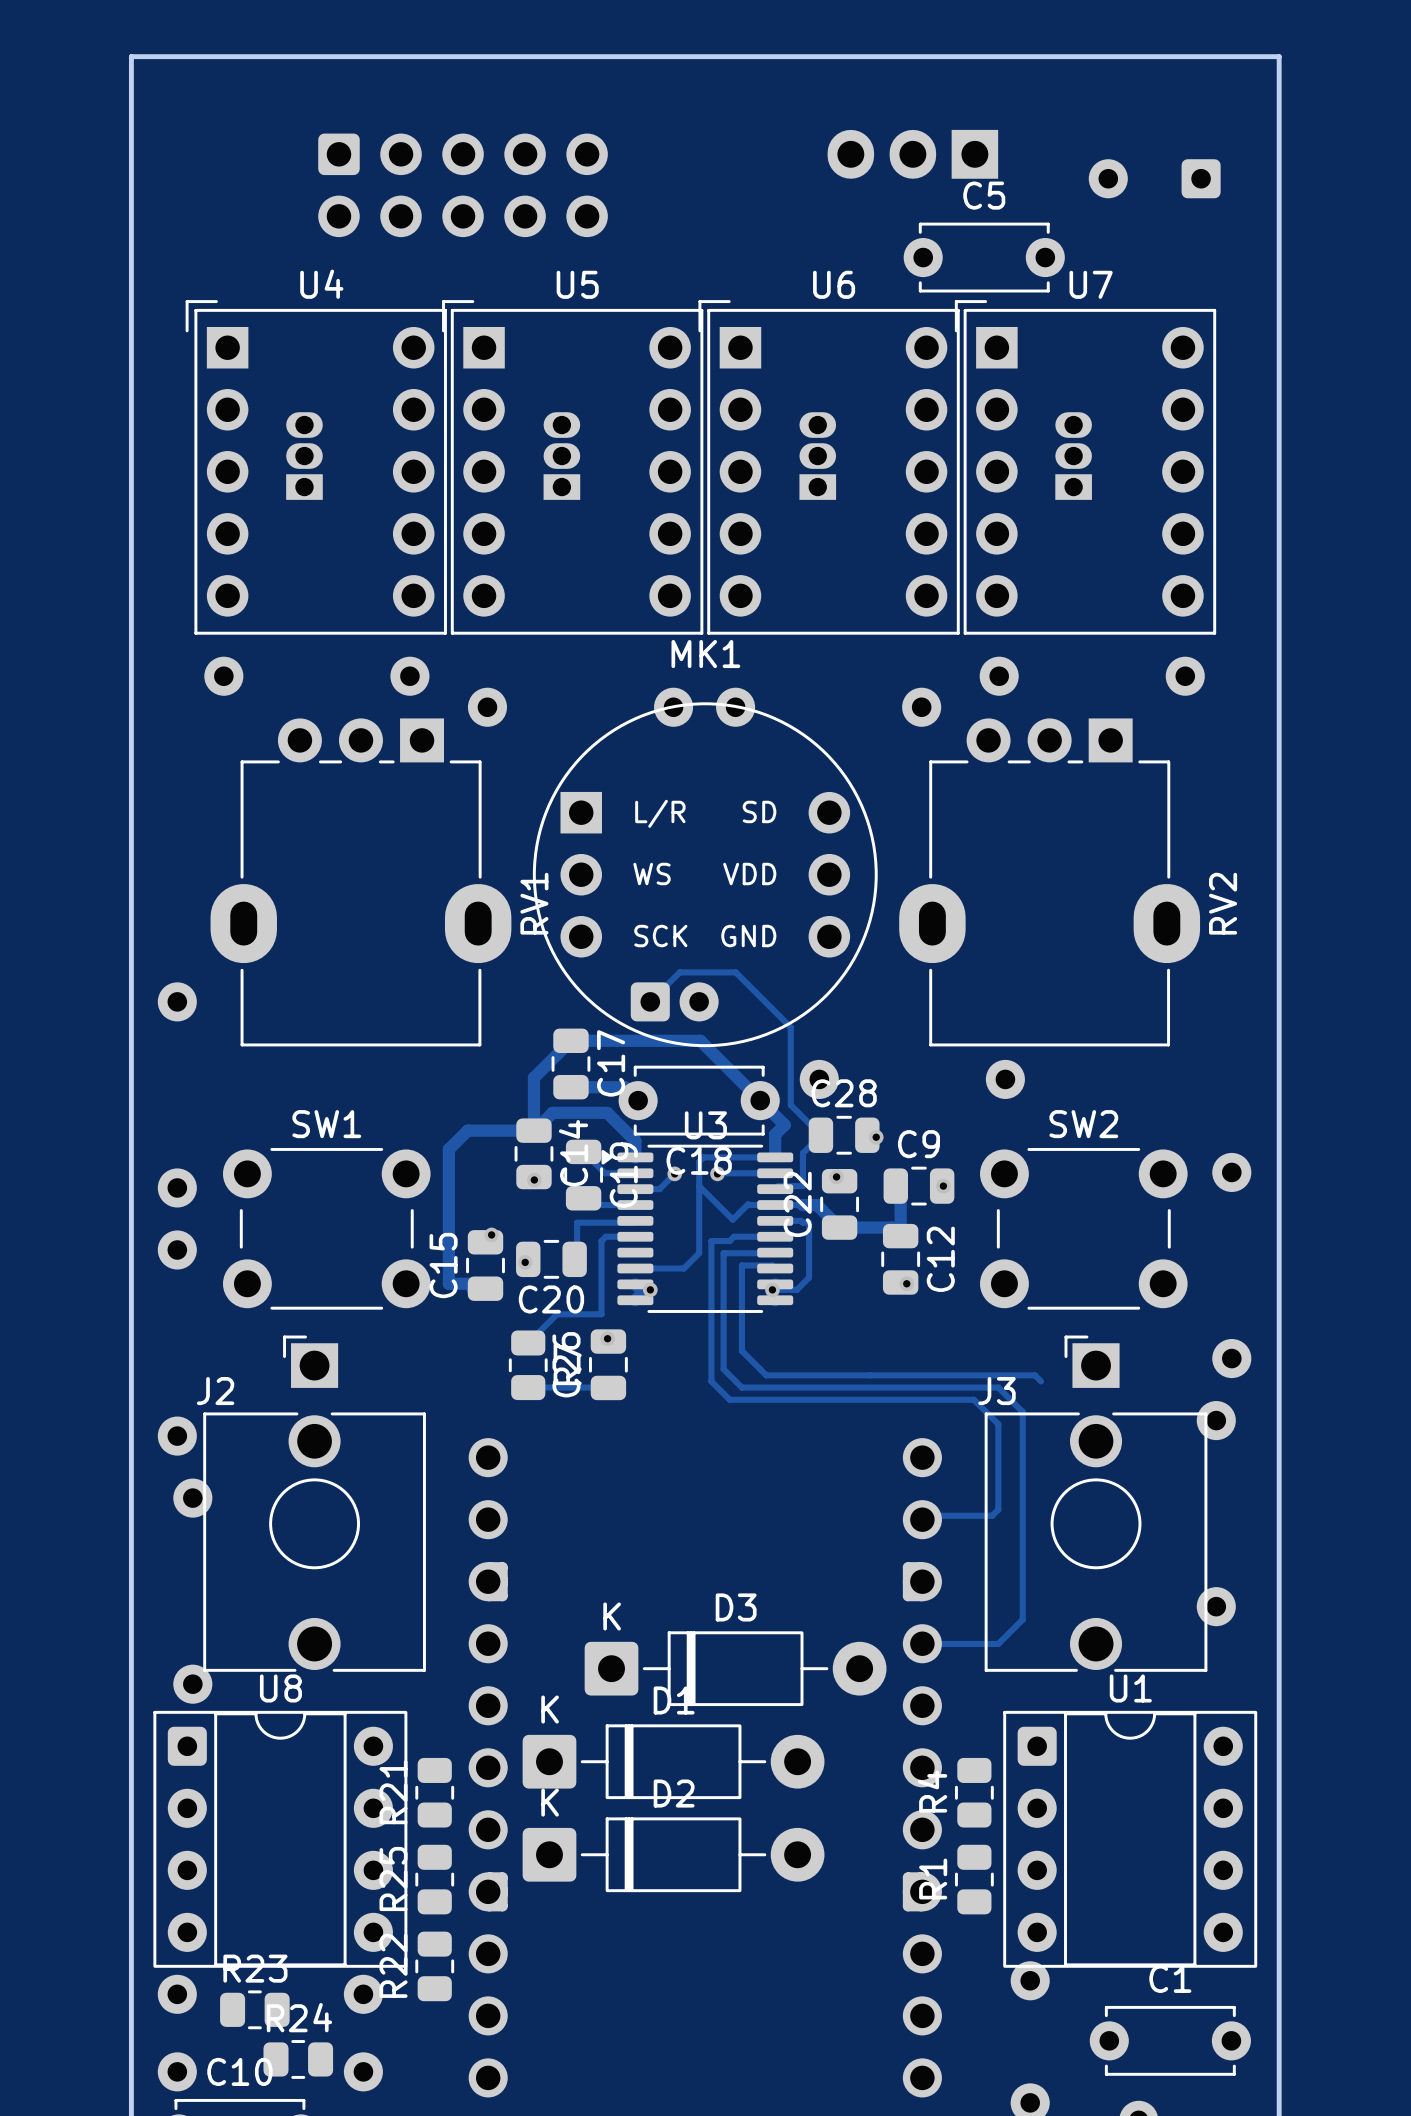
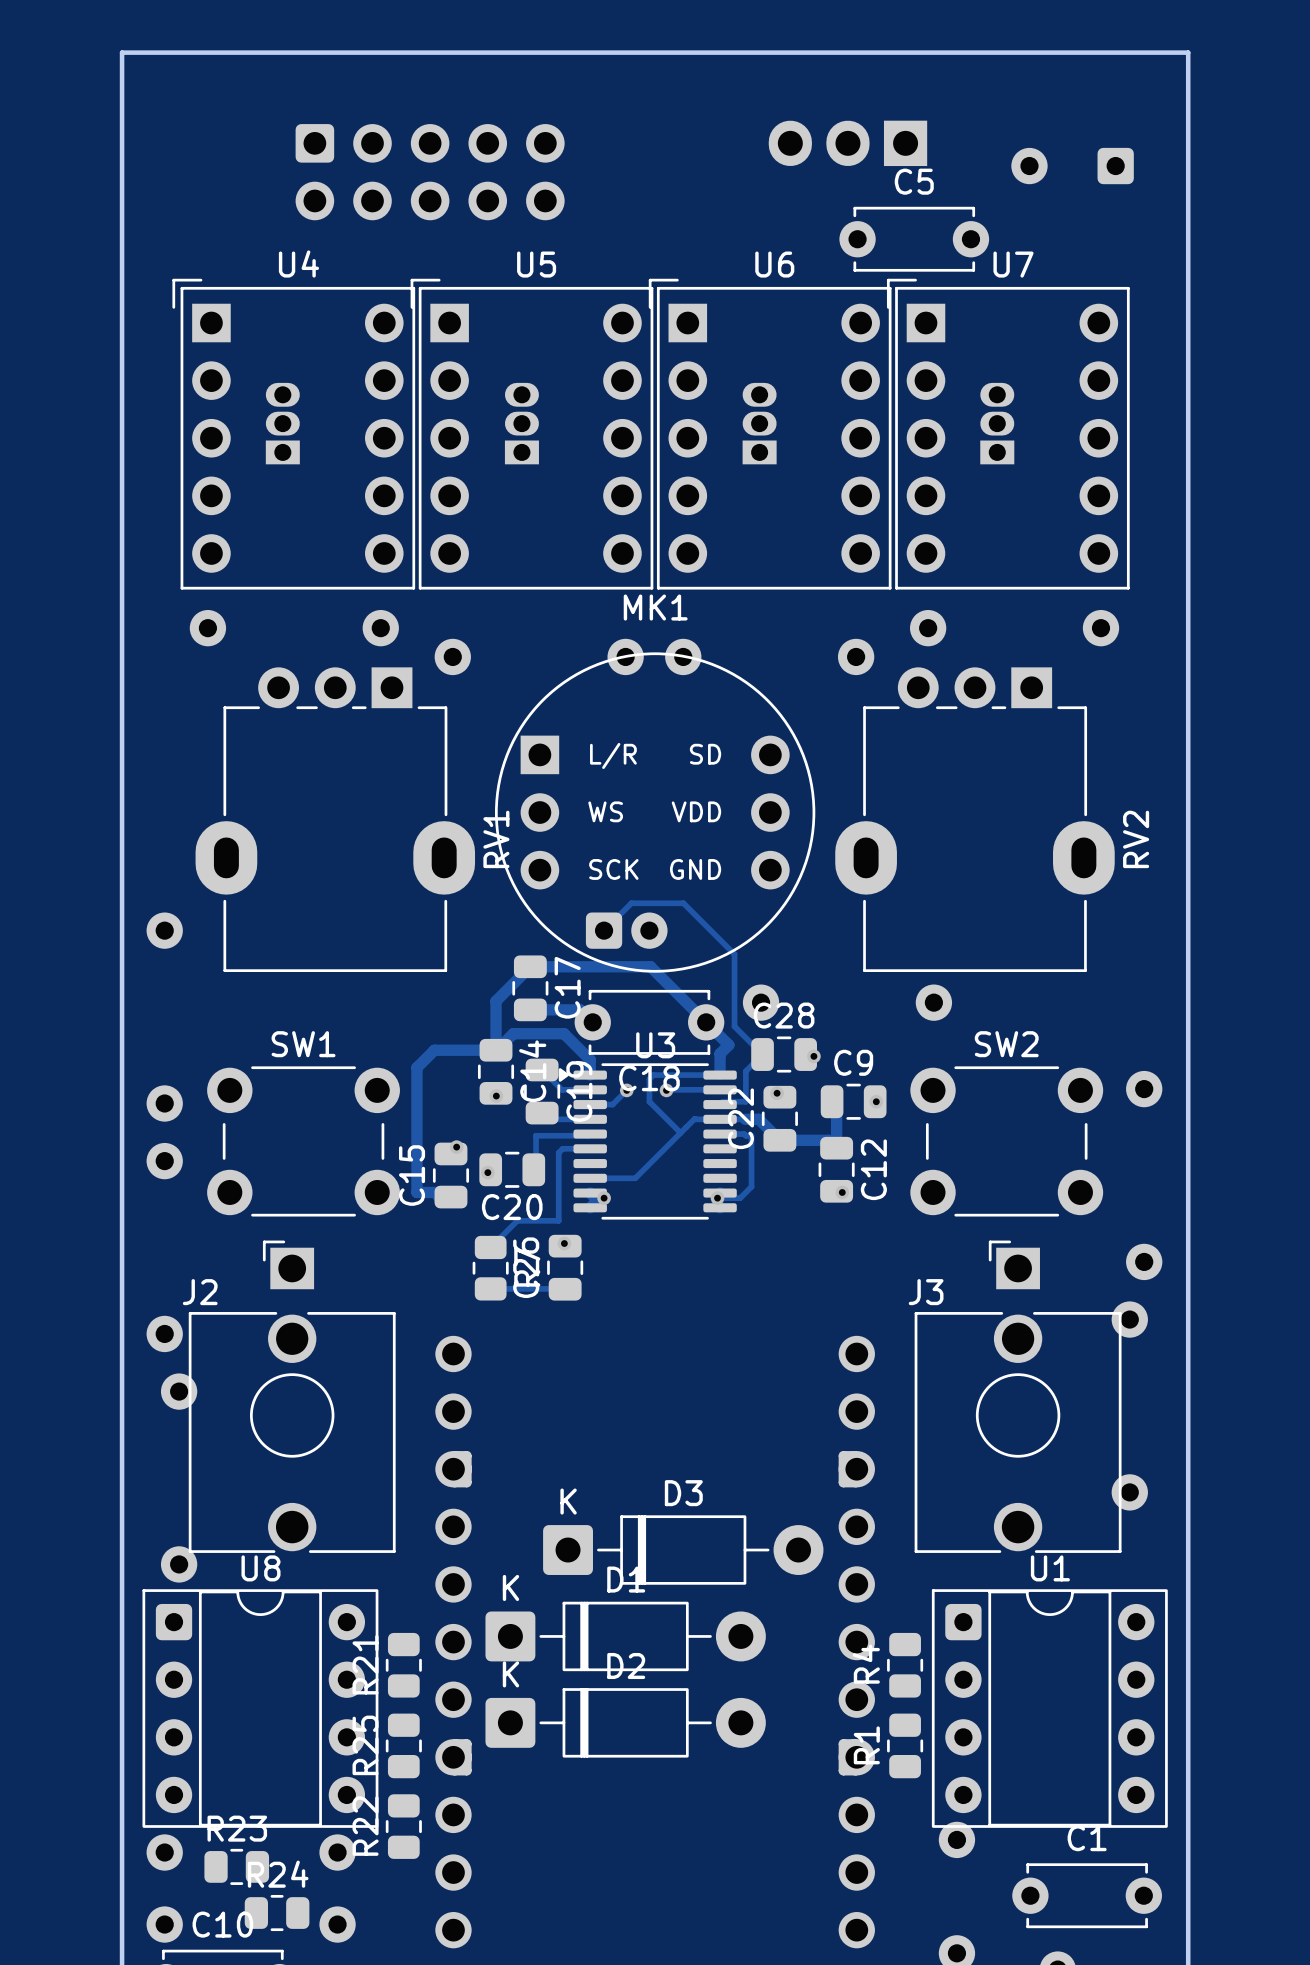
track: (699, 1186) (699, 1253) -> (680, 1132) (649, 1164)
track: (775, 1236) (733, 1236) (729, 1241) (711, 1241) (711, 1381) (729, 1399) (973, 1399) (998, 1424) (998, 1509) (992, 1515) (926, 1515) (922, 1519) -> none
track: (775, 1252) (723, 1253) (723, 1369) (741, 1387) (998, 1387) (1022, 1411) (1022, 1619) (998, 1643) (922, 1643) -> none
track: (775, 1268) (772, 1265) (741, 1265) (741, 1350) (766, 1375) (1034, 1375) (1041, 1381) -> none

